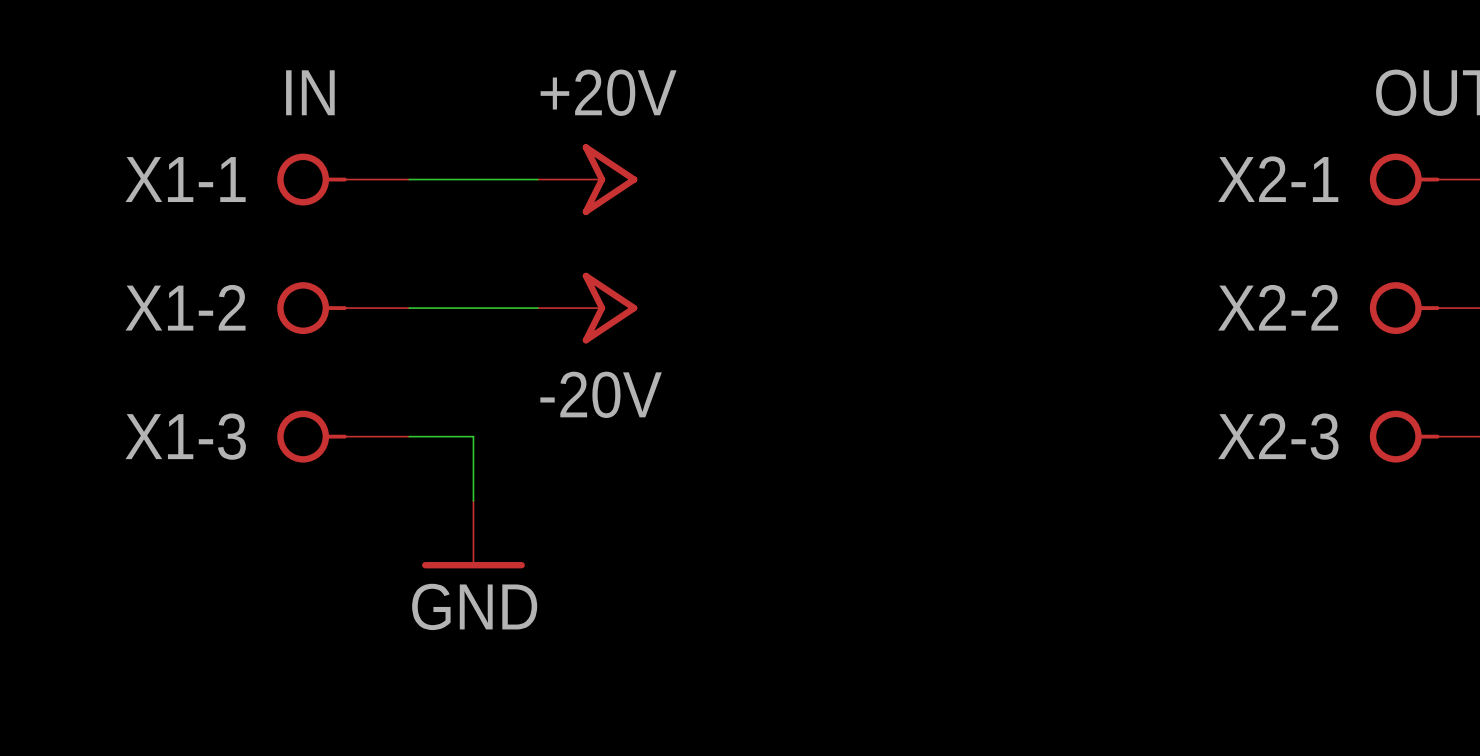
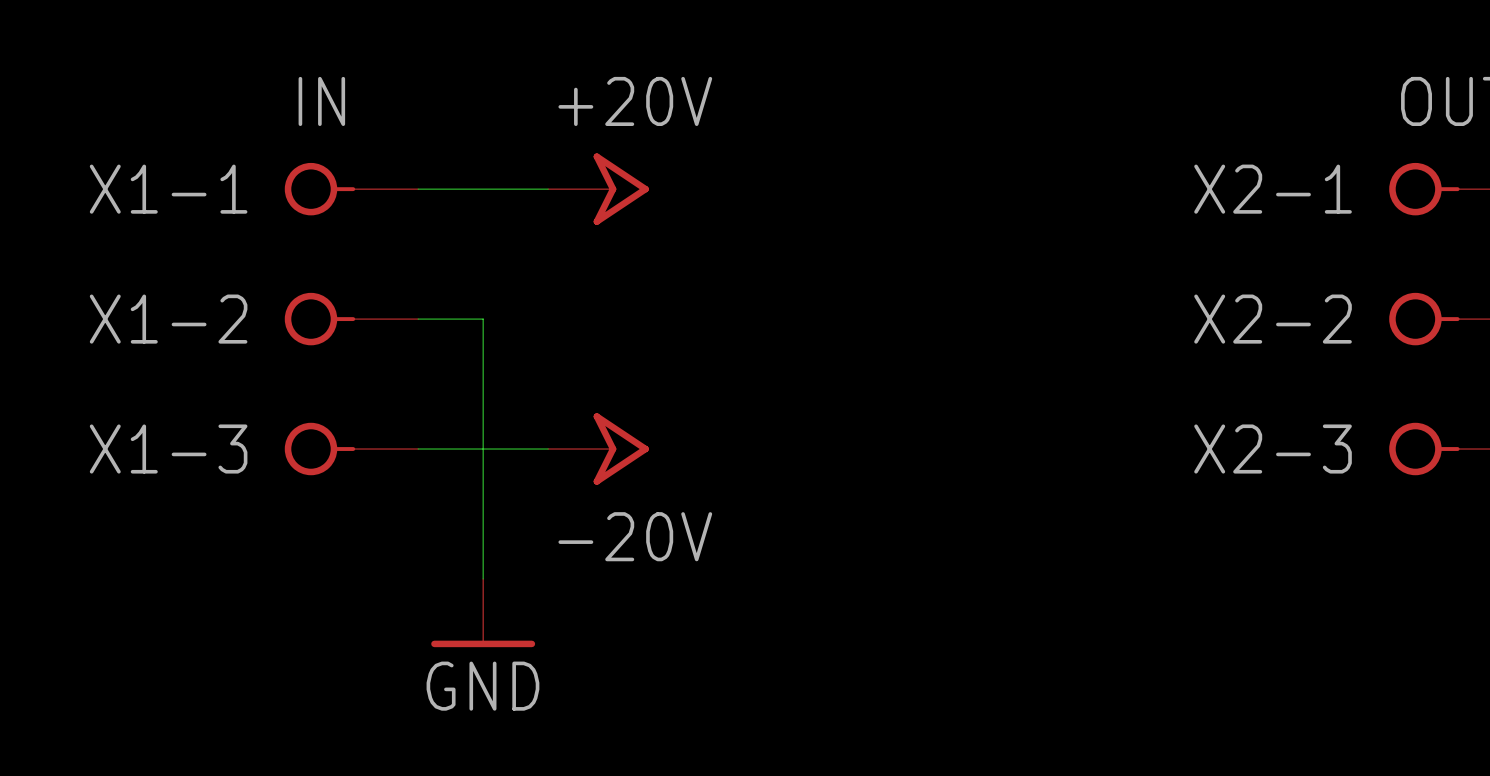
wire: (473, 308) (537, 308) -> (483, 319) (483, 449) (548, 449)
power symbol position: -20V (587, 308) -> -20V (598, 449)
power symbol position: GND (473, 534) -> GND (483, 613)

